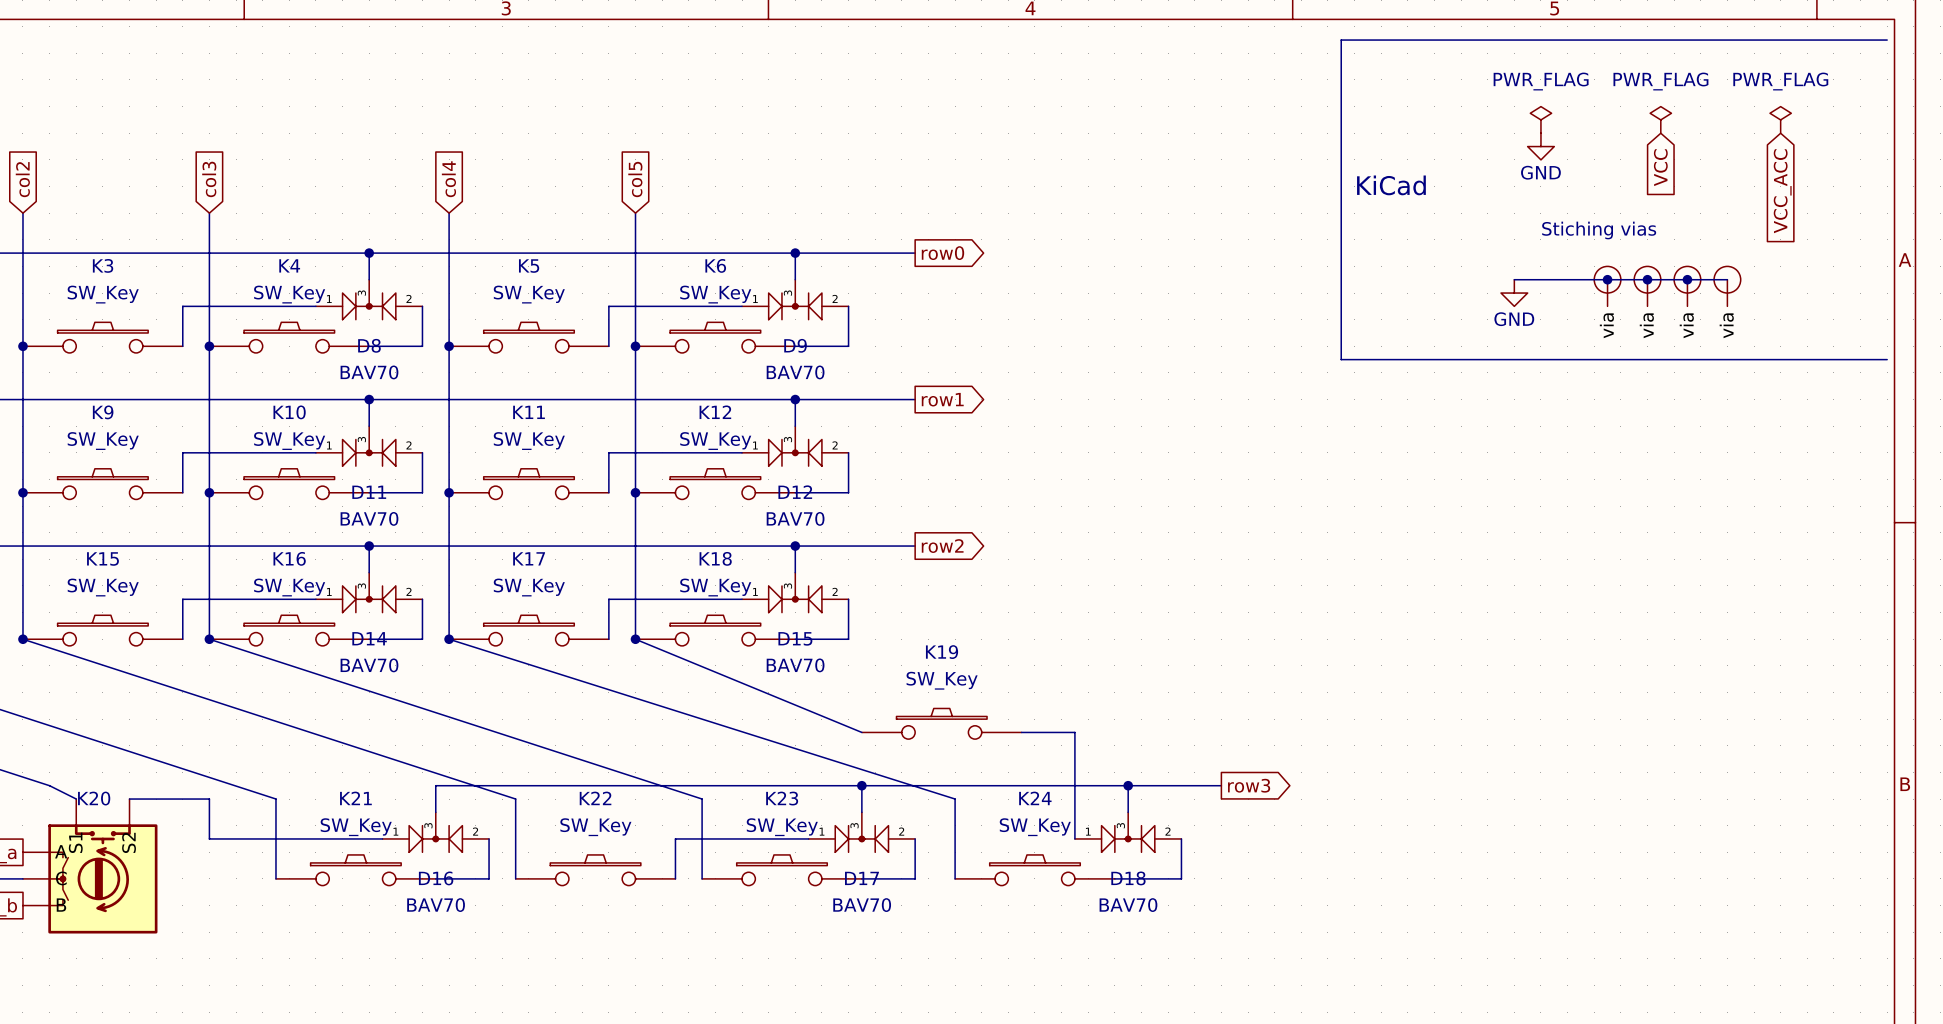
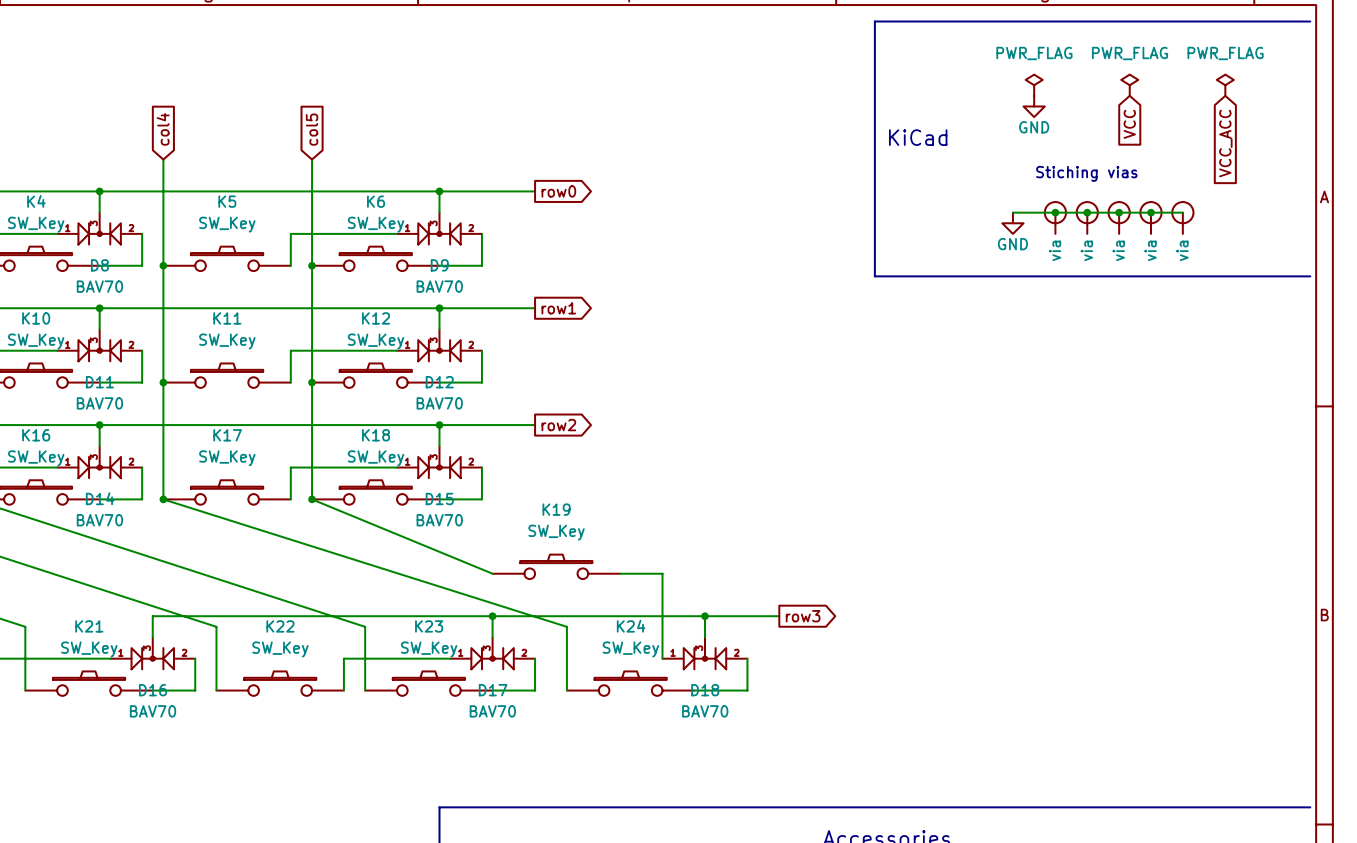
junction: none -> (1055, 212)
part: none -> (1055, 217)

